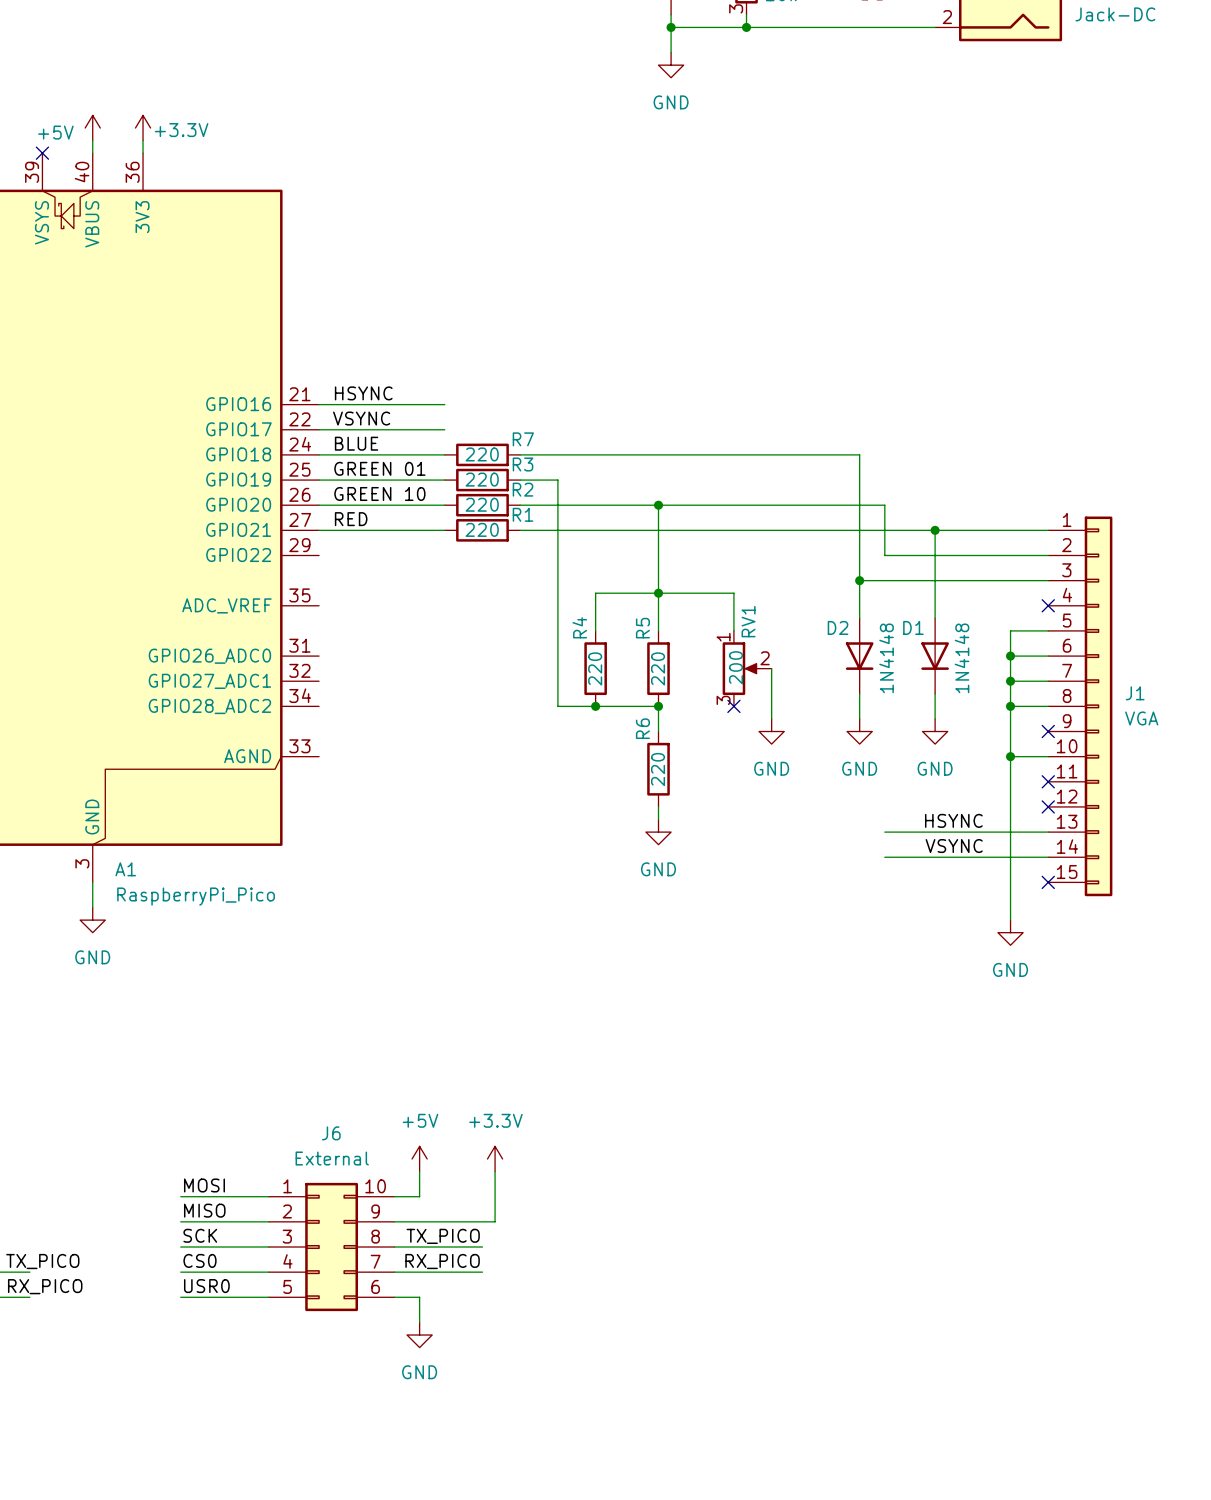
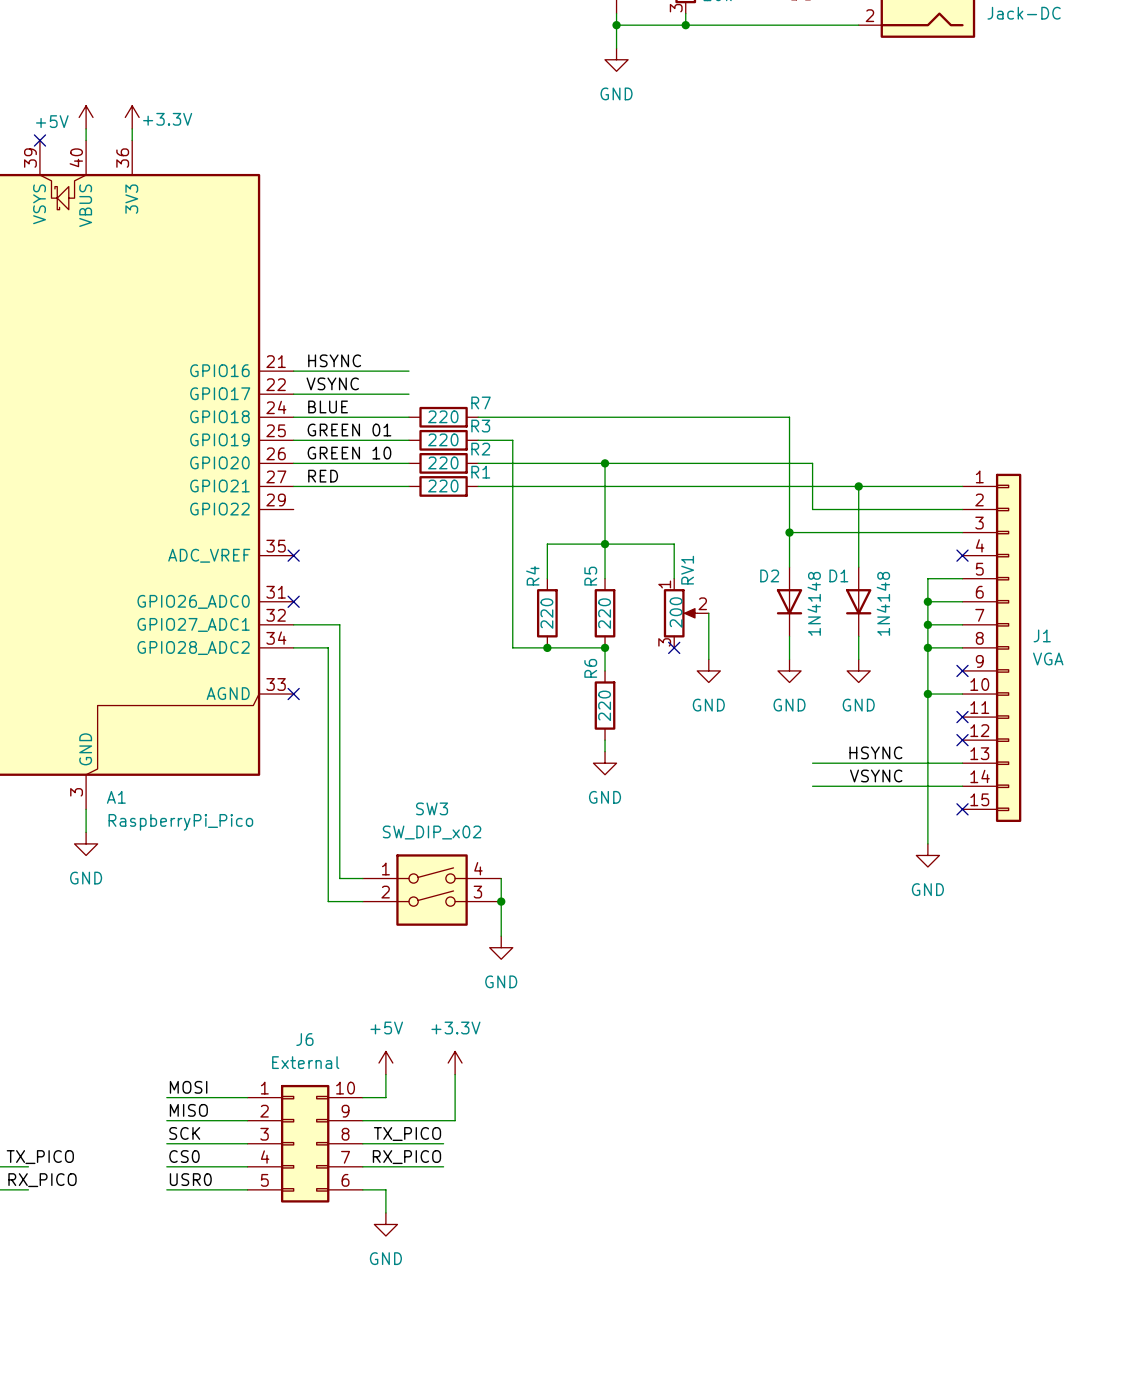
no-connect mark: none -> (293, 555)
no-connect mark: none -> (293, 601)
wire: none -> (293, 624) (339, 624) (339, 878) (362, 878)
wire: none -> (293, 647) (328, 647) (328, 901) (362, 901)
no-connect mark: none -> (293, 694)
wire: none -> (501, 878) (501, 936)
SW3: none -> SW_DIP_x02 (432, 890)
junction: none -> (501, 901)
power symbol: none -> GND (501, 947)

